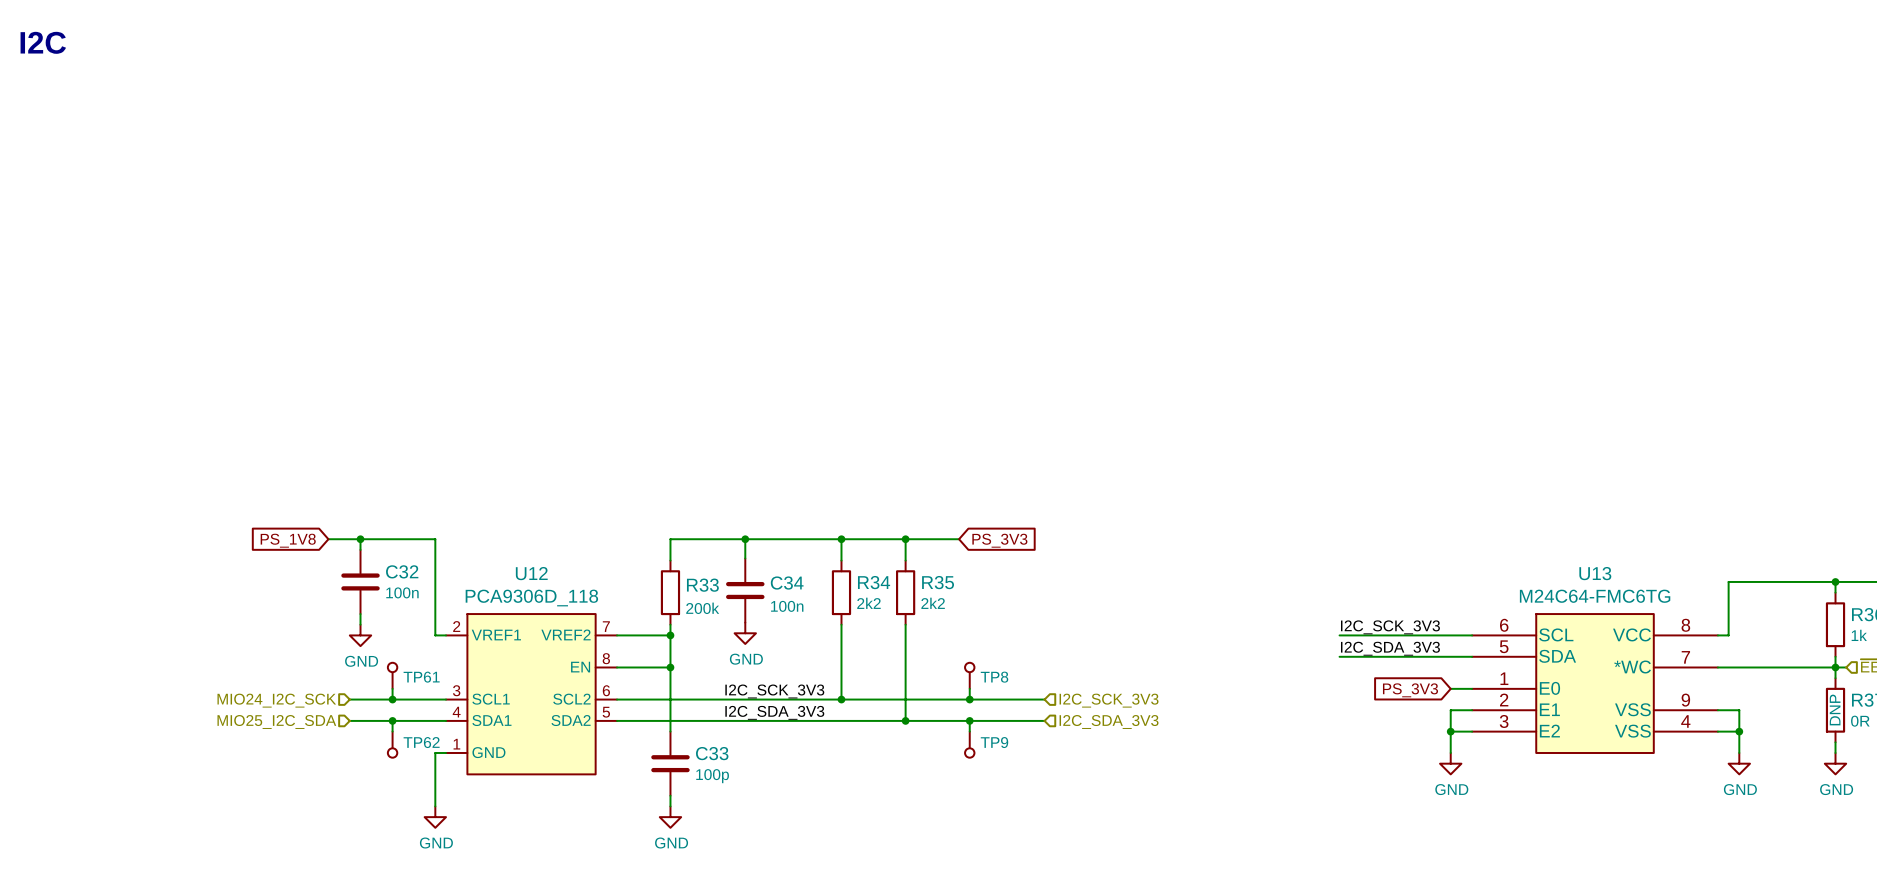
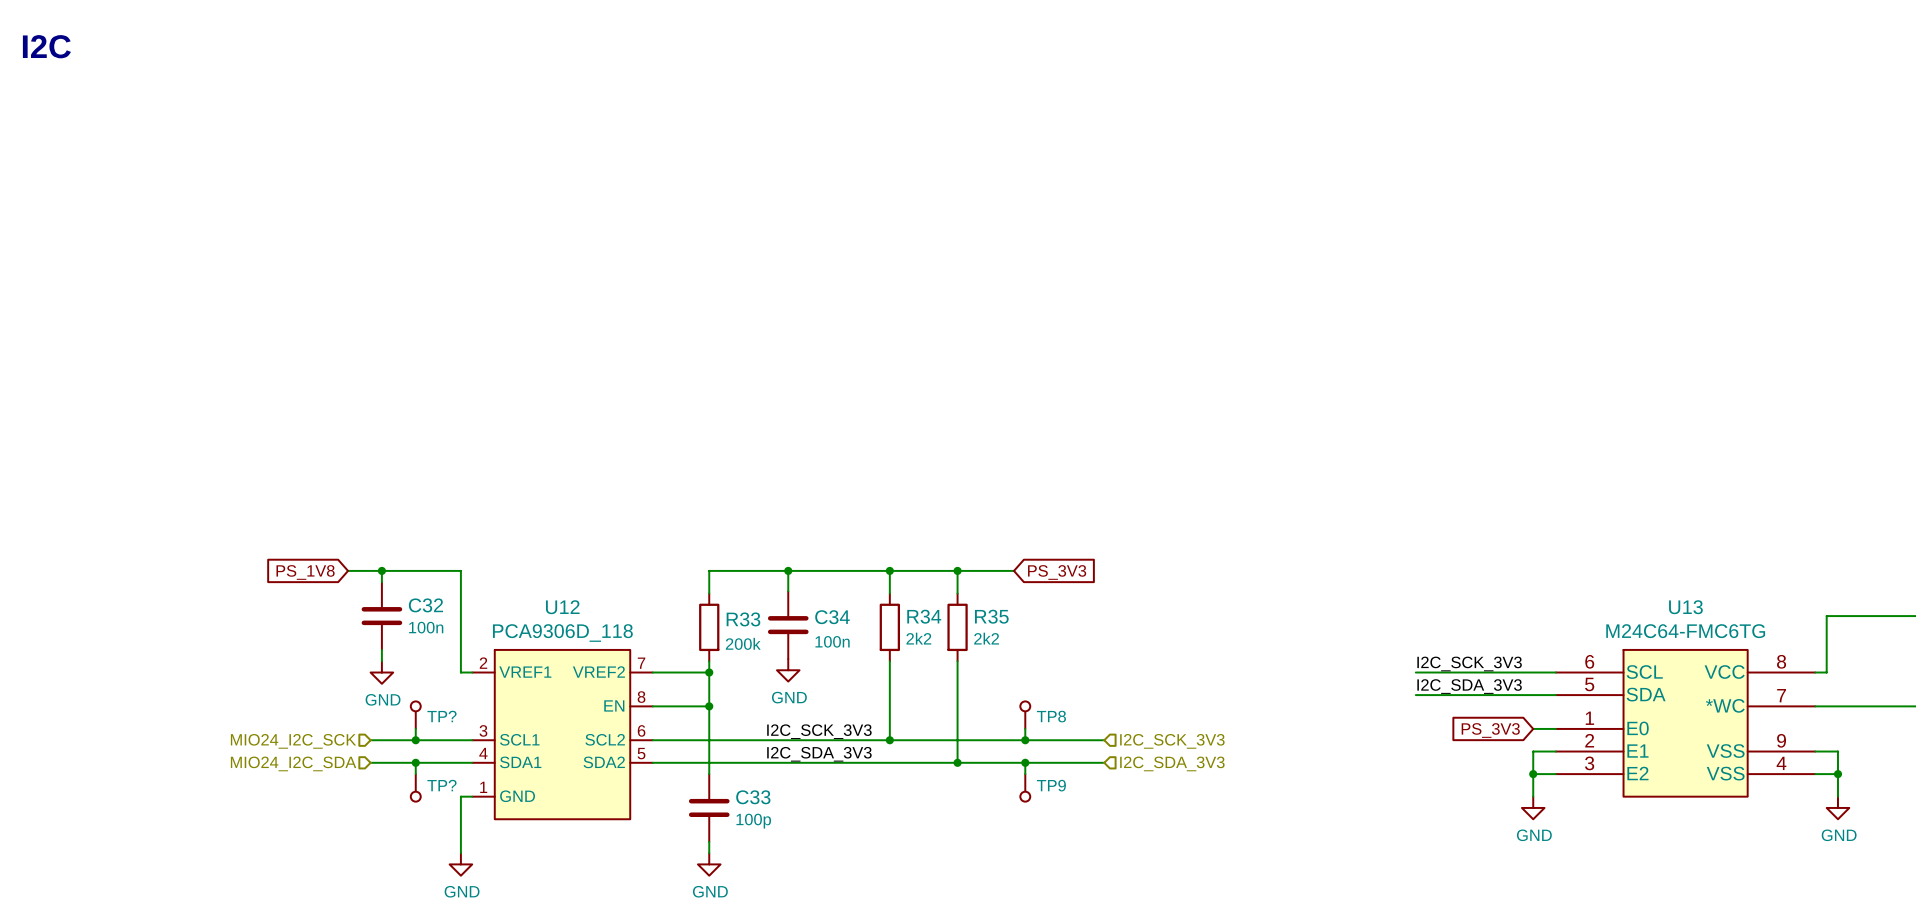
TP61 name: TP61 (421, 677) -> TP? (441, 716)
hierarchical label: MIO25_I2C_SDA (276, 721) -> MIO24_I2C_SDA (293, 763)
TP62 name: TP62 (421, 742) -> TP? (441, 785)

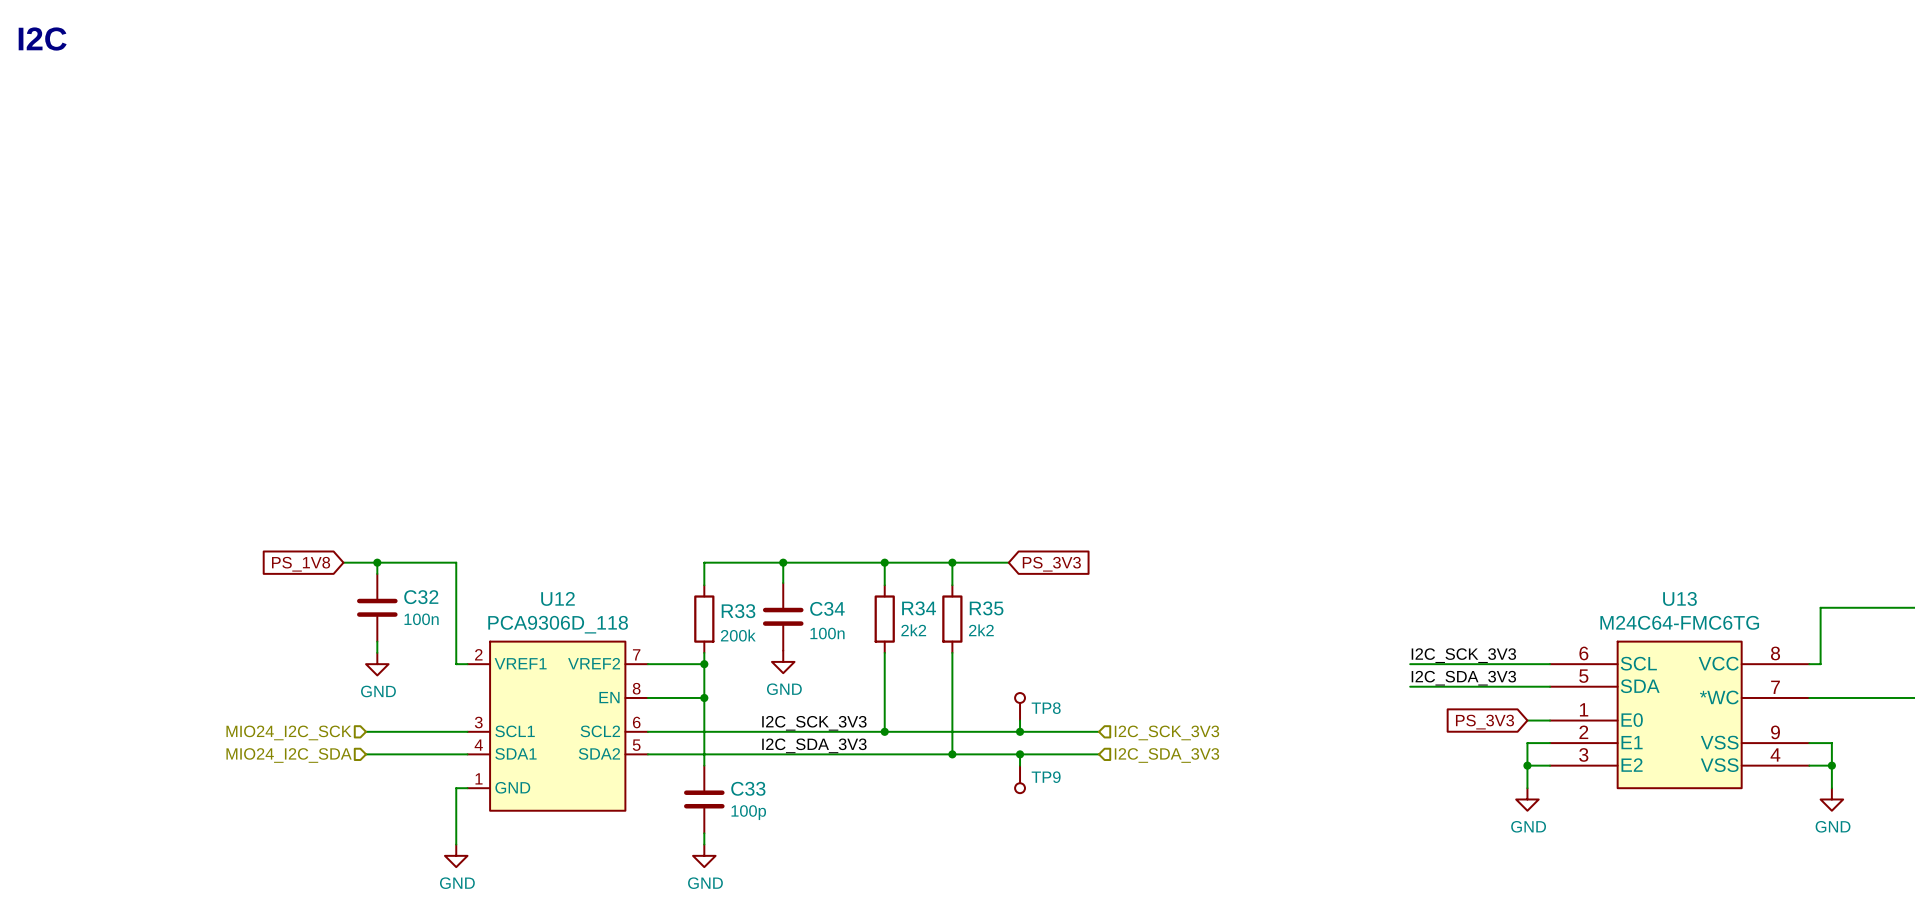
TP?: (415, 715) -> none
wire: (415, 728) (415, 740) -> none
junction: (415, 740) -> none
wire: (415, 762) (415, 774) -> none
junction: (415, 762) -> none
TP?: (415, 787) -> none

